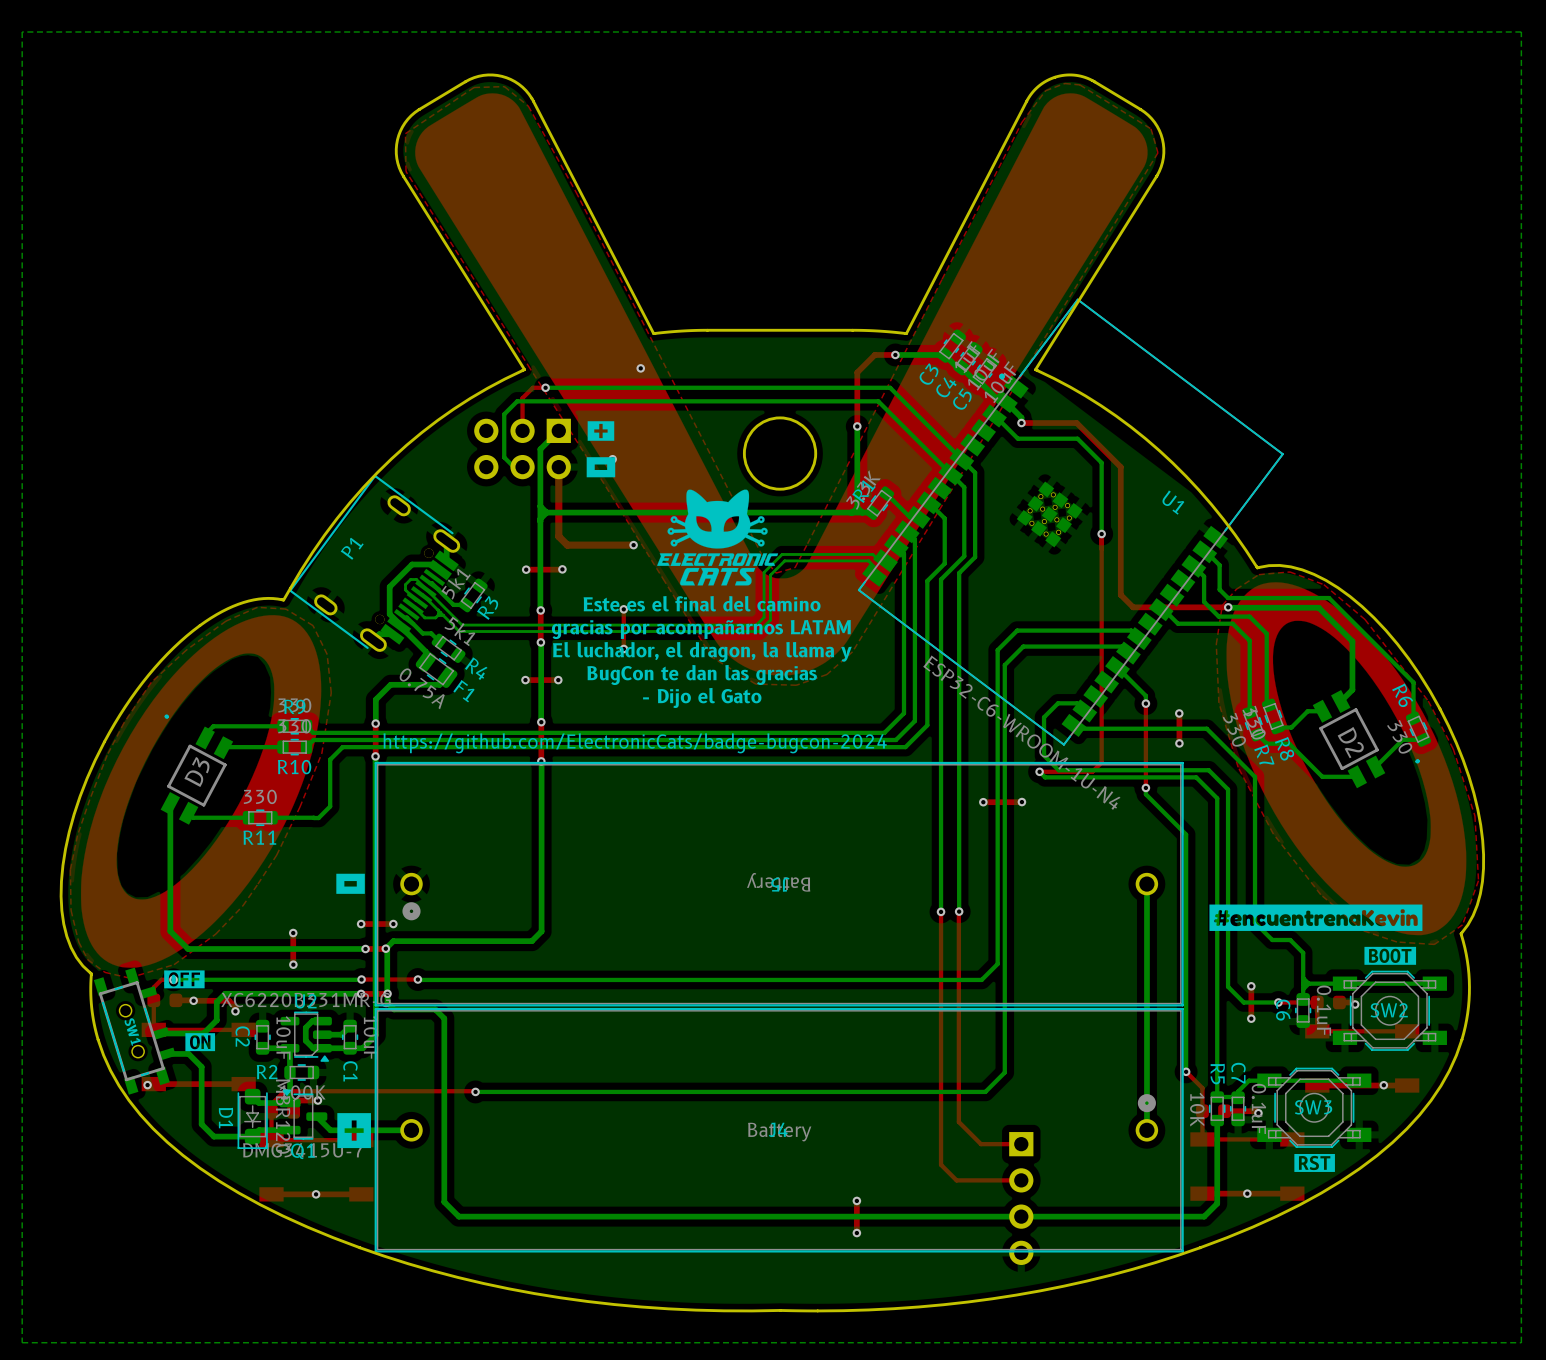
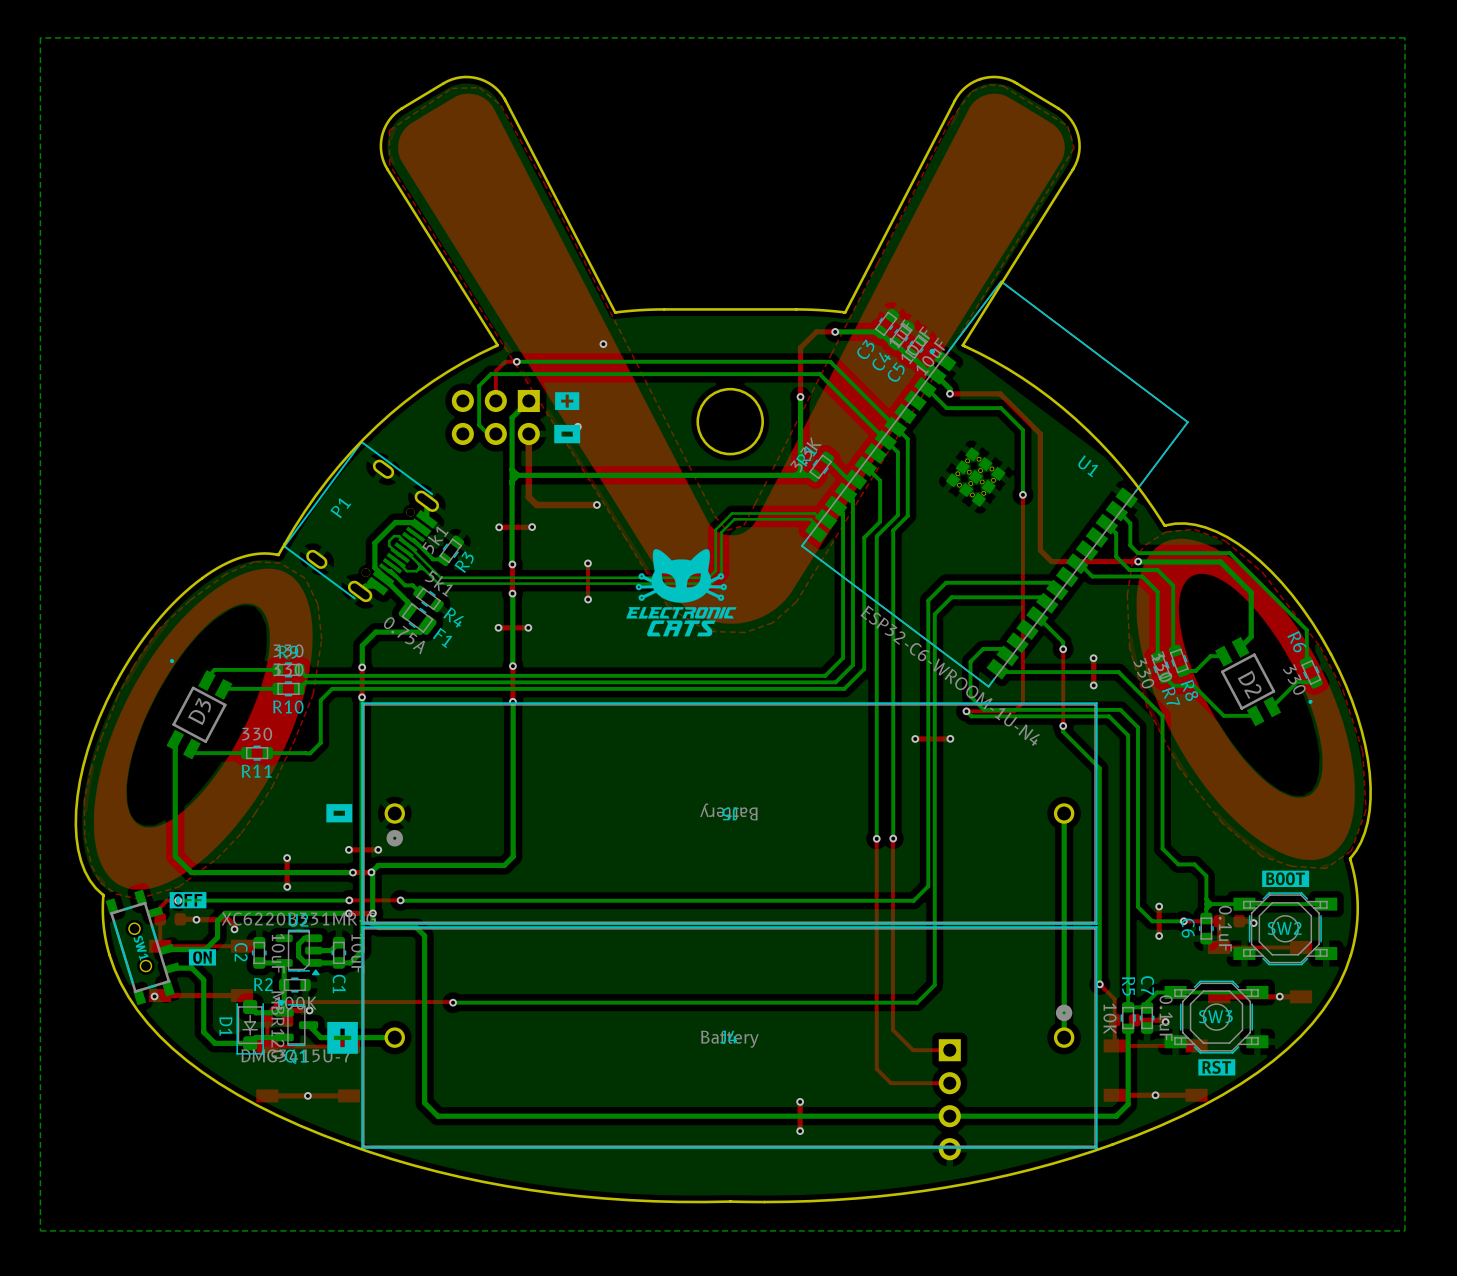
drawing position: (717, 537) -> (681, 592)
text: Este es el final del camino (702, 603) -> none
text: gracias por acompañarnos LATAM (701, 629) -> none
text: El luchador, el dragon, la llama y (702, 652) -> none
text: BugCon te dan las gracias (702, 674) -> none
text: - Dijo el Gato (702, 697) -> none
text: https://github.com/ElectronicCats/badge-bugcon-2024 (635, 743) -> none
drawing: [1209, 904, 1423, 931] -> none

